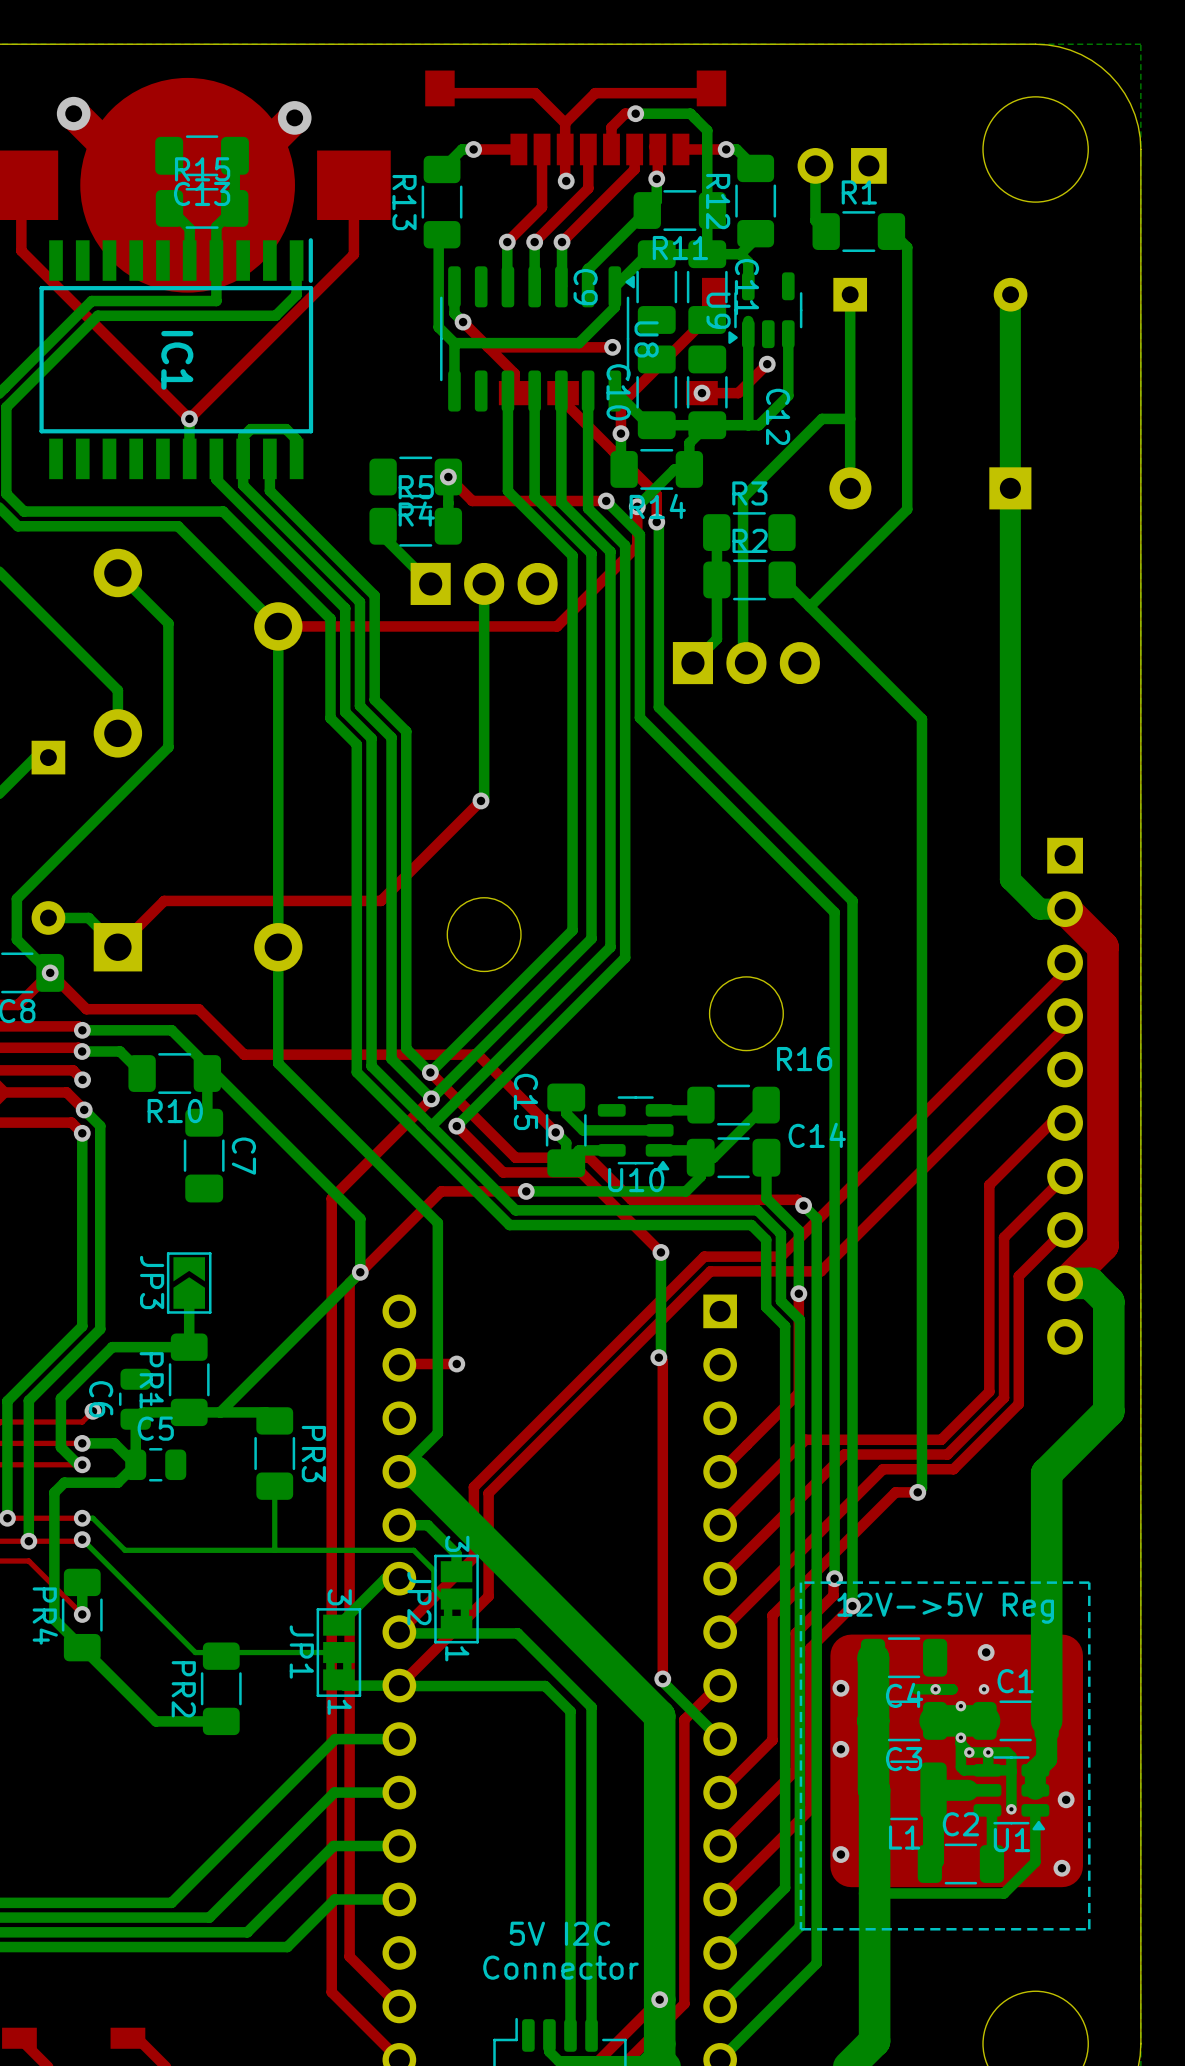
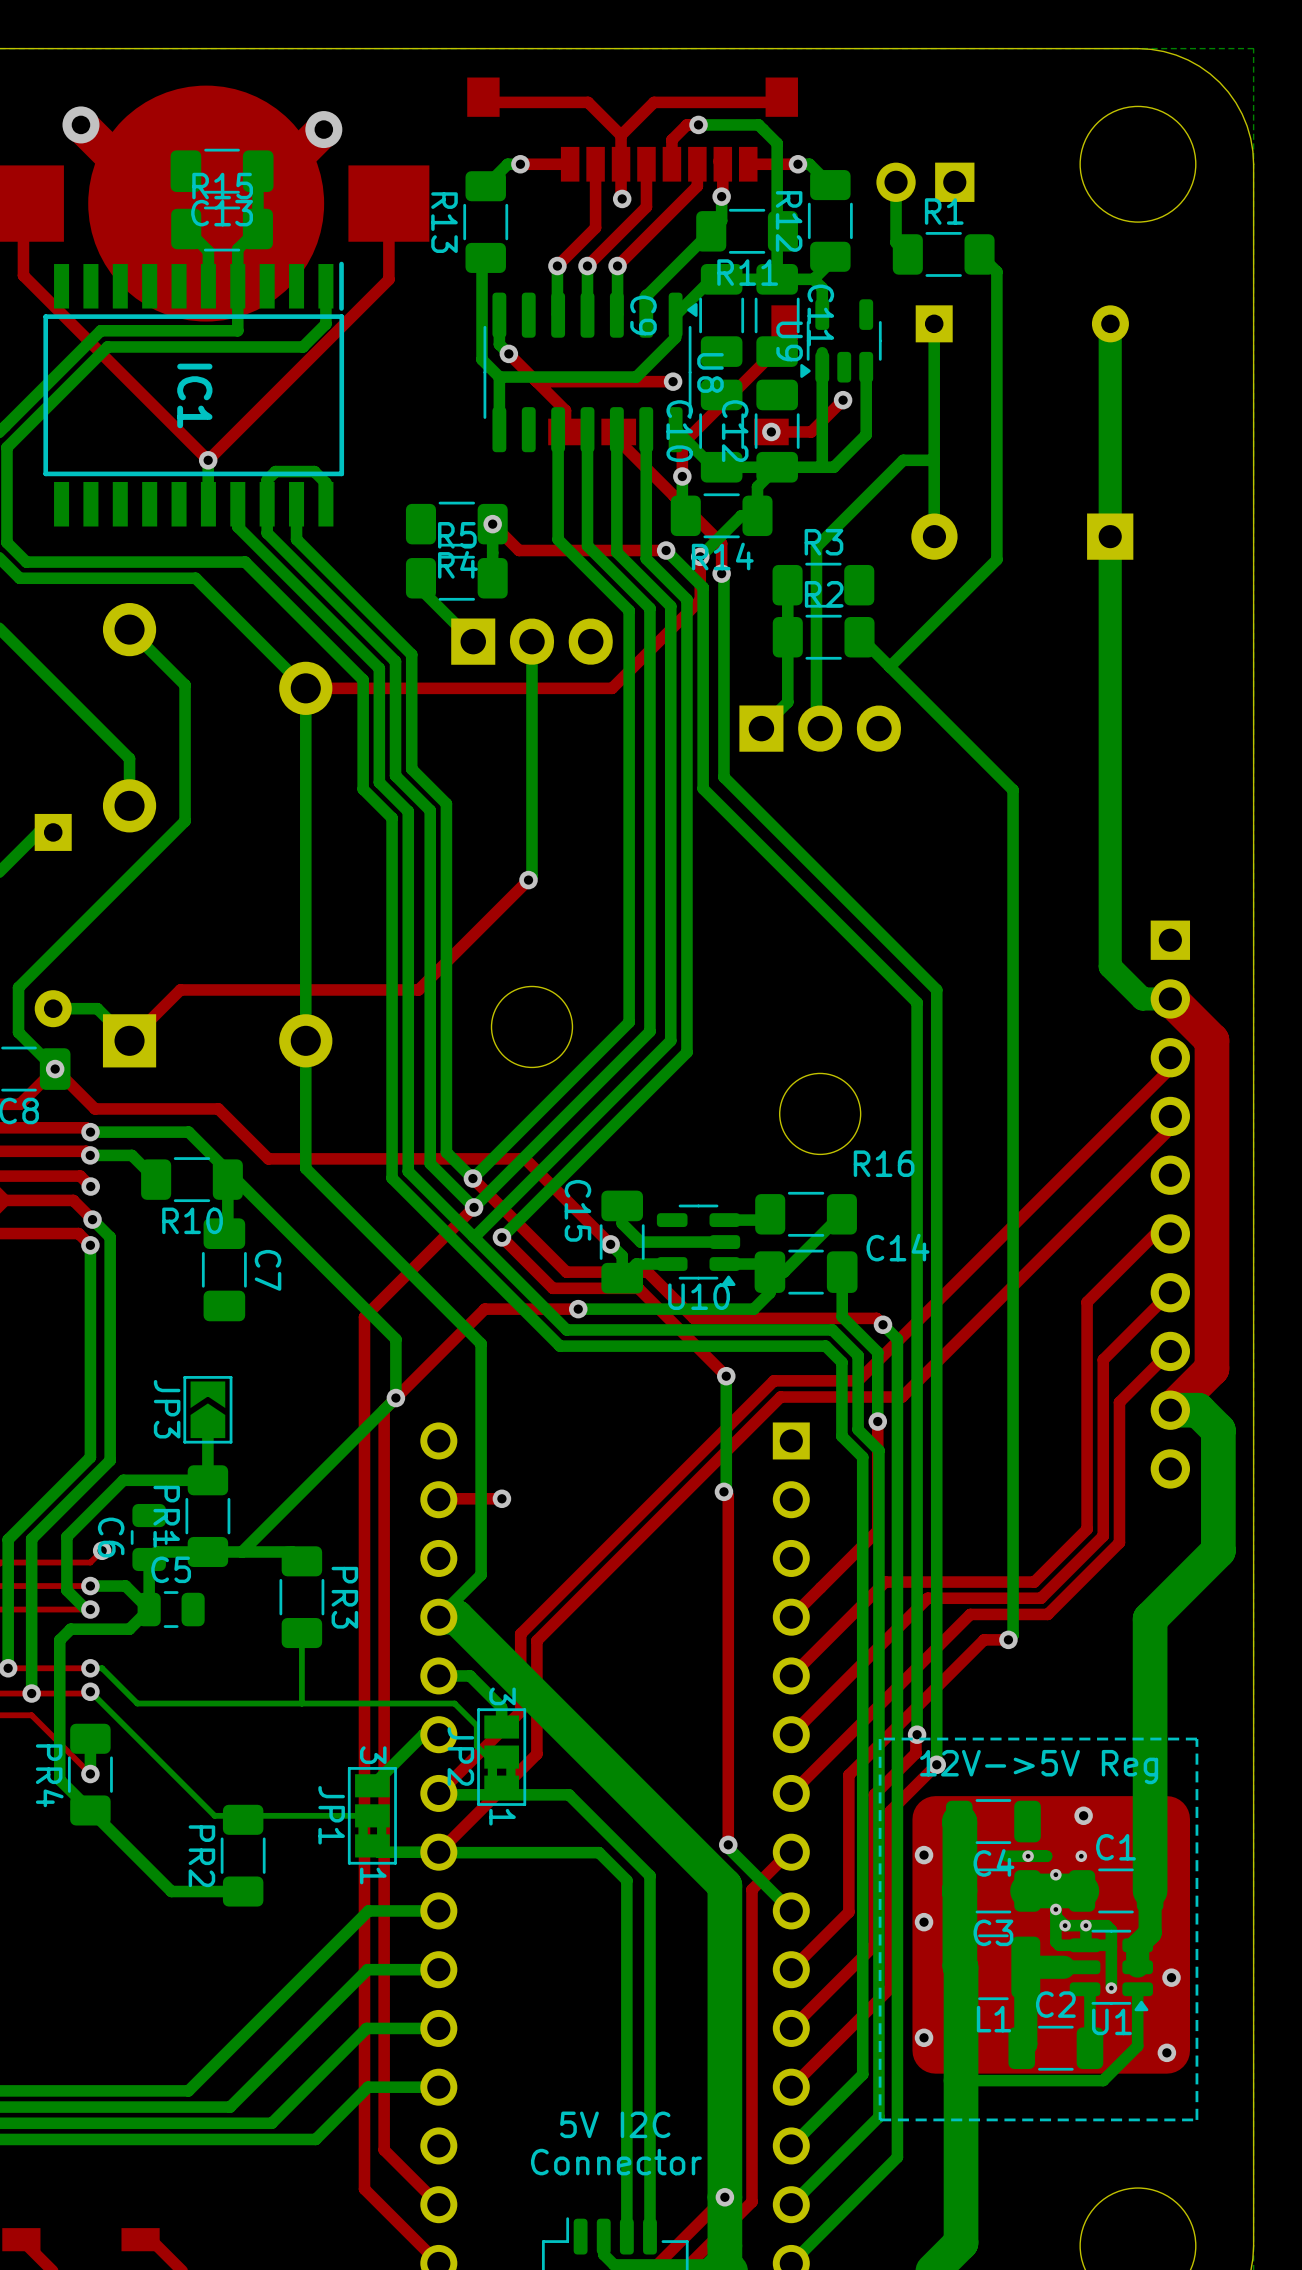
C12 name position: C12 (778, 416) -> C12 (735, 431)

